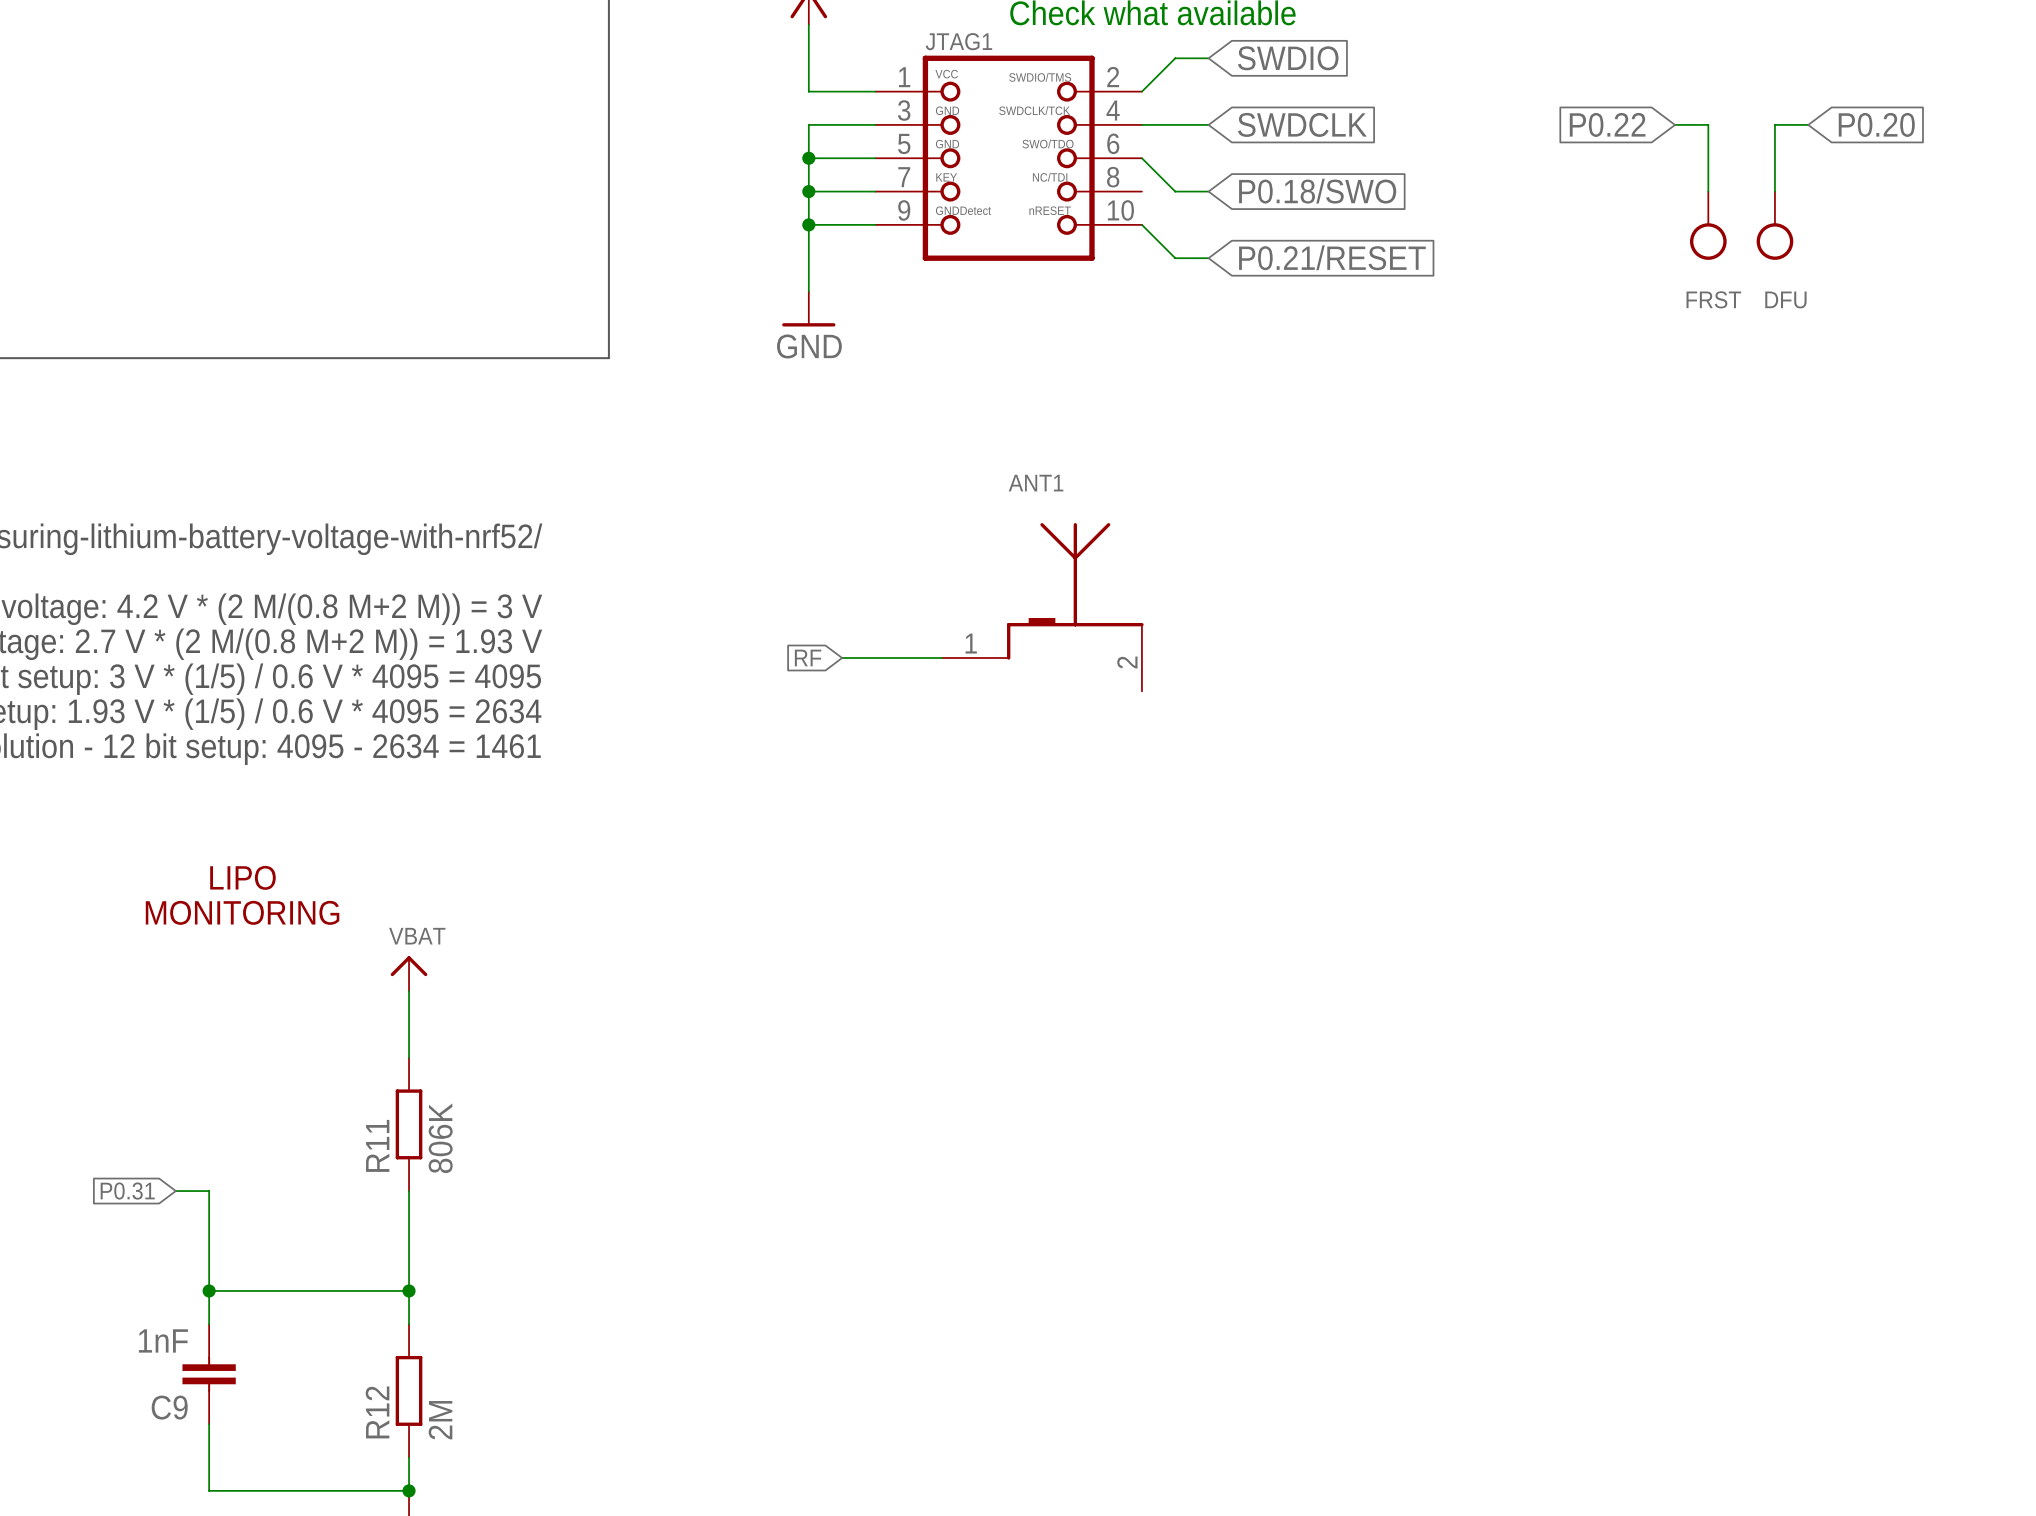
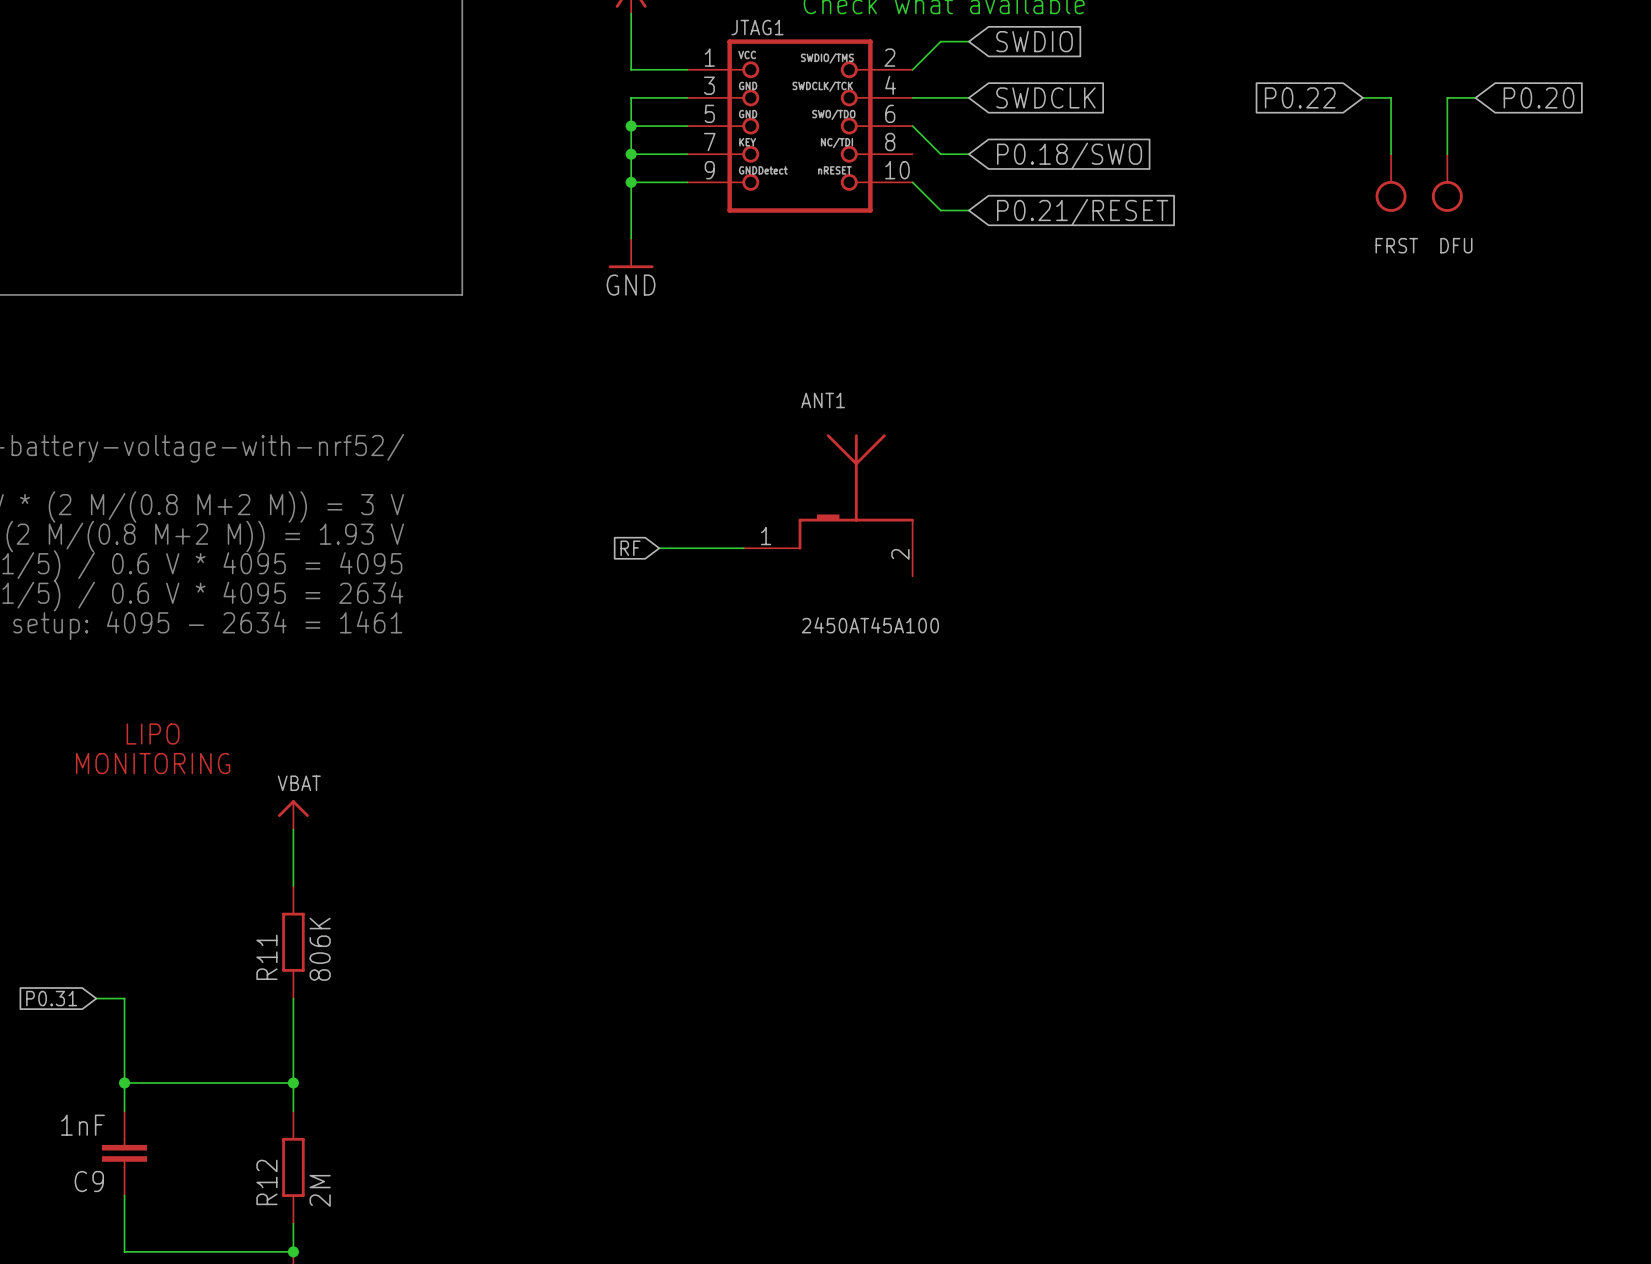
ANT1 value: none -> 2450AT45A100 (870, 625)

